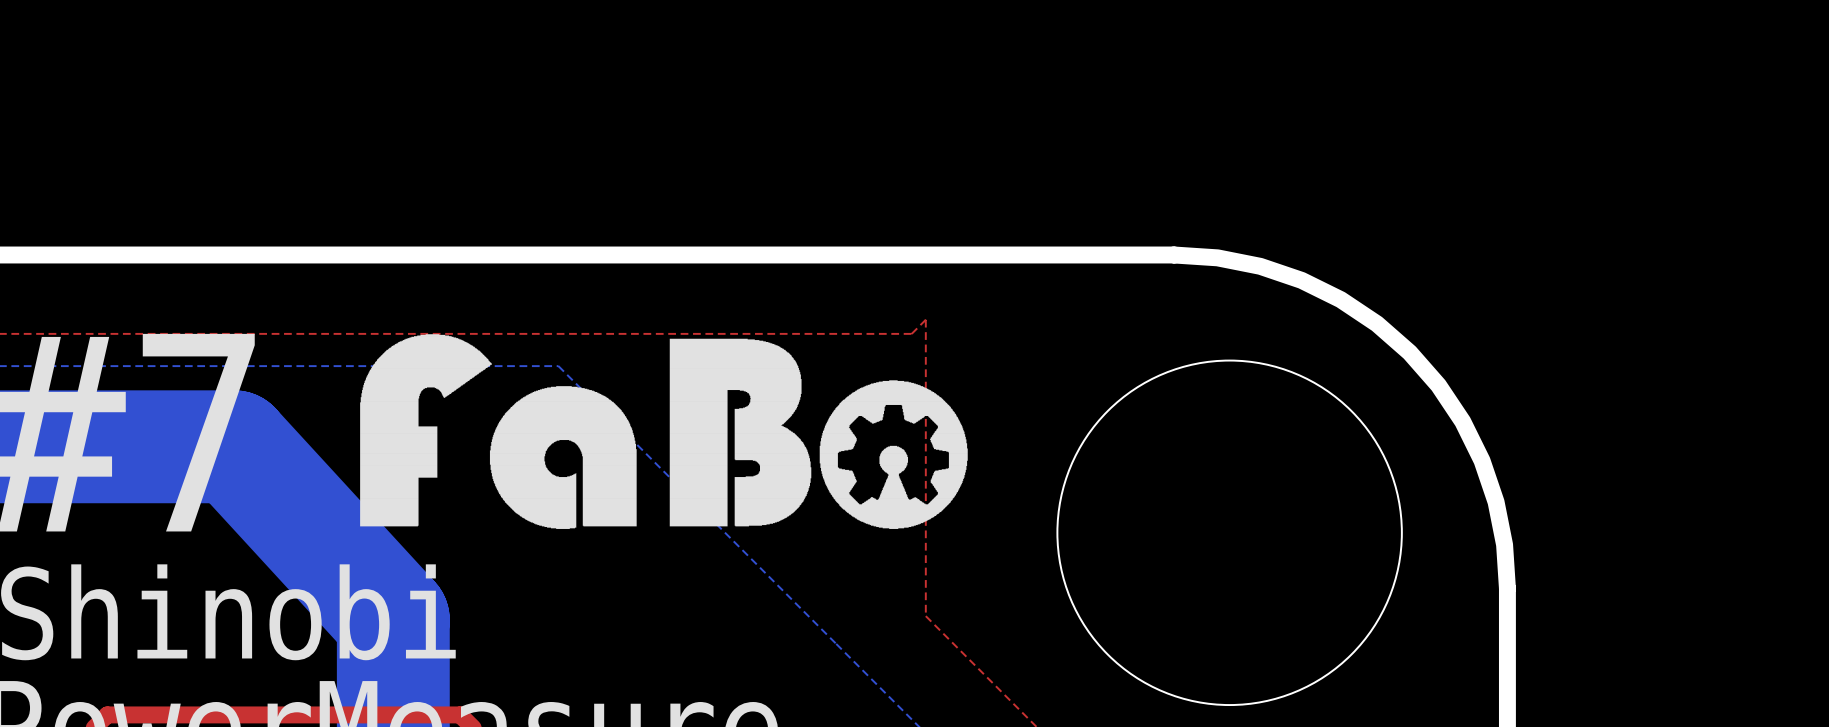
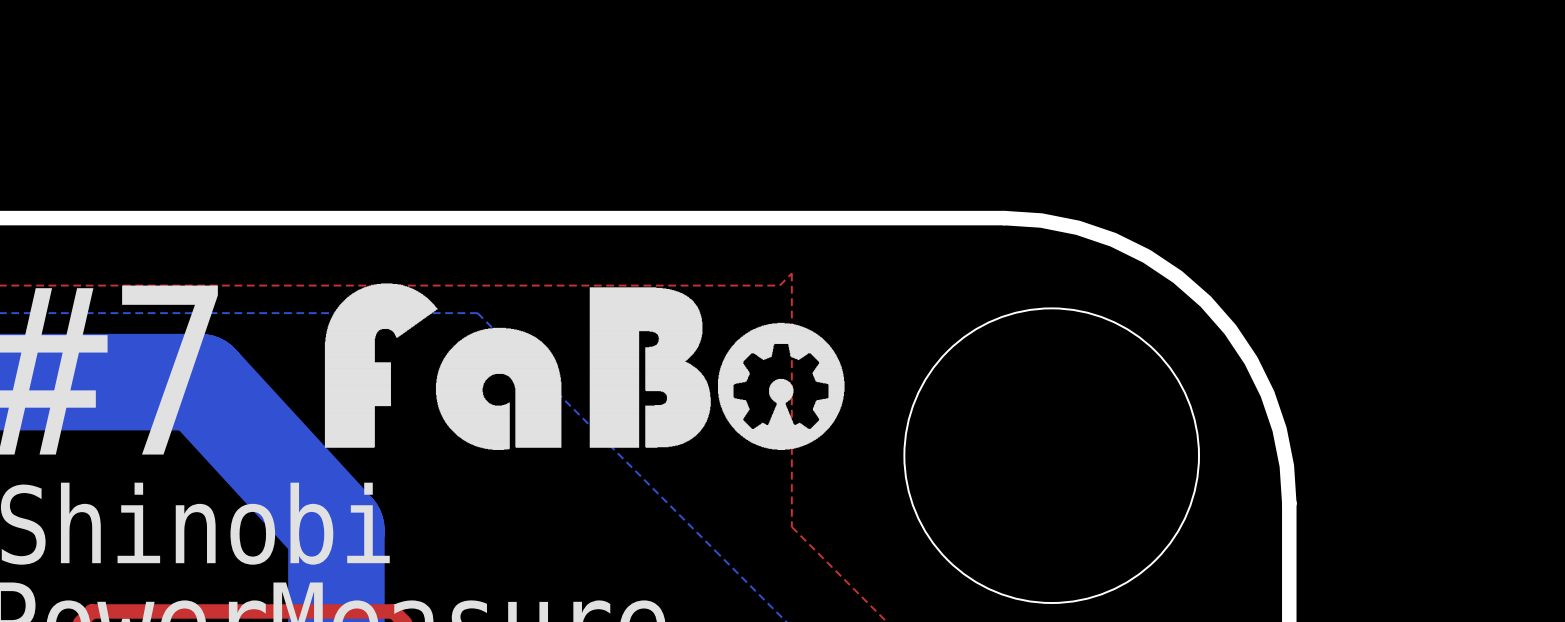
drawing position: (663, 431) -> (584, 366)

